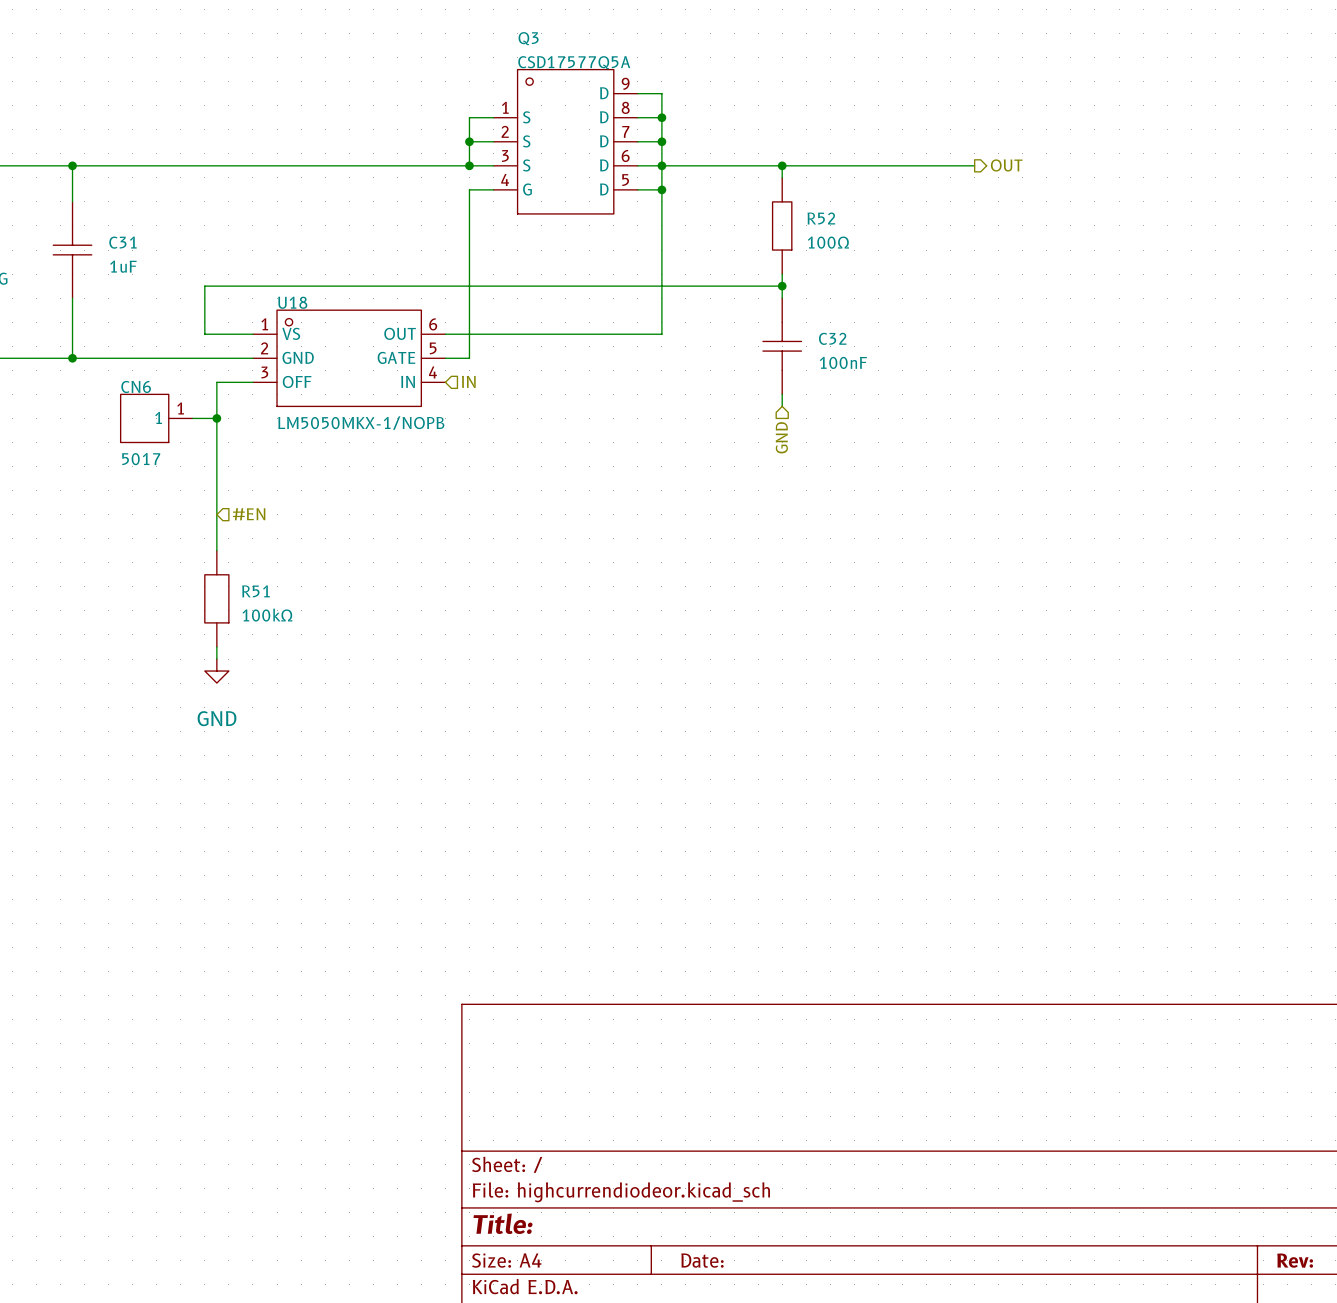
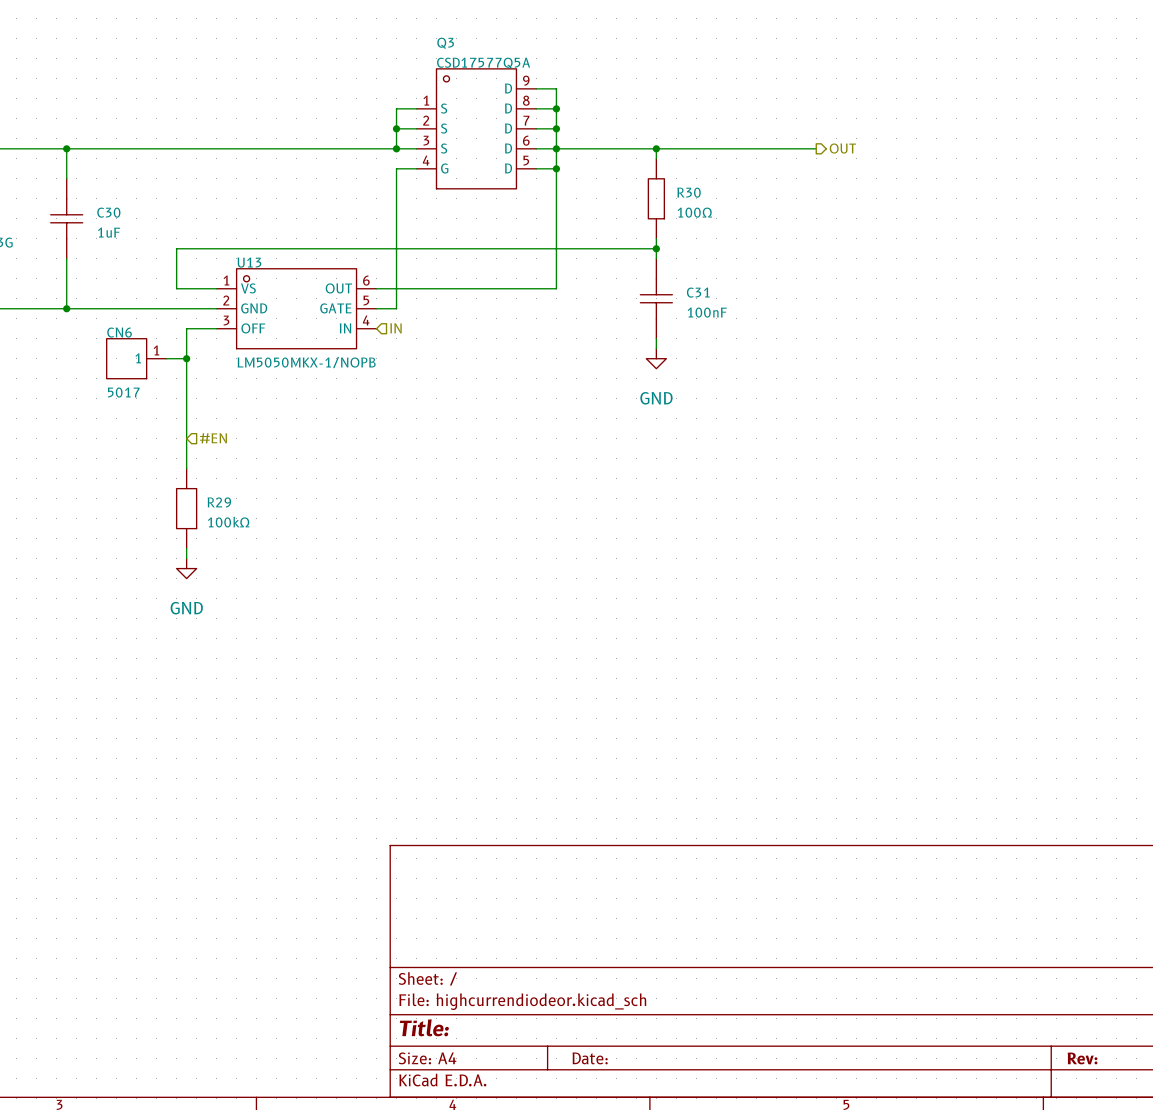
R52 name: R52 (821, 218) -> R30 (689, 192)
C31 name: C31 (123, 242) -> C30 (108, 212)
U18 name: U18 (292, 302) -> U13 (249, 262)
C32 name: C32 (832, 338) -> C31 (698, 292)
power symbol: none -> GND (656, 358)
hierarchical label: GND (781, 437) -> none
R51 name: R51 (255, 591) -> R29 (219, 502)

